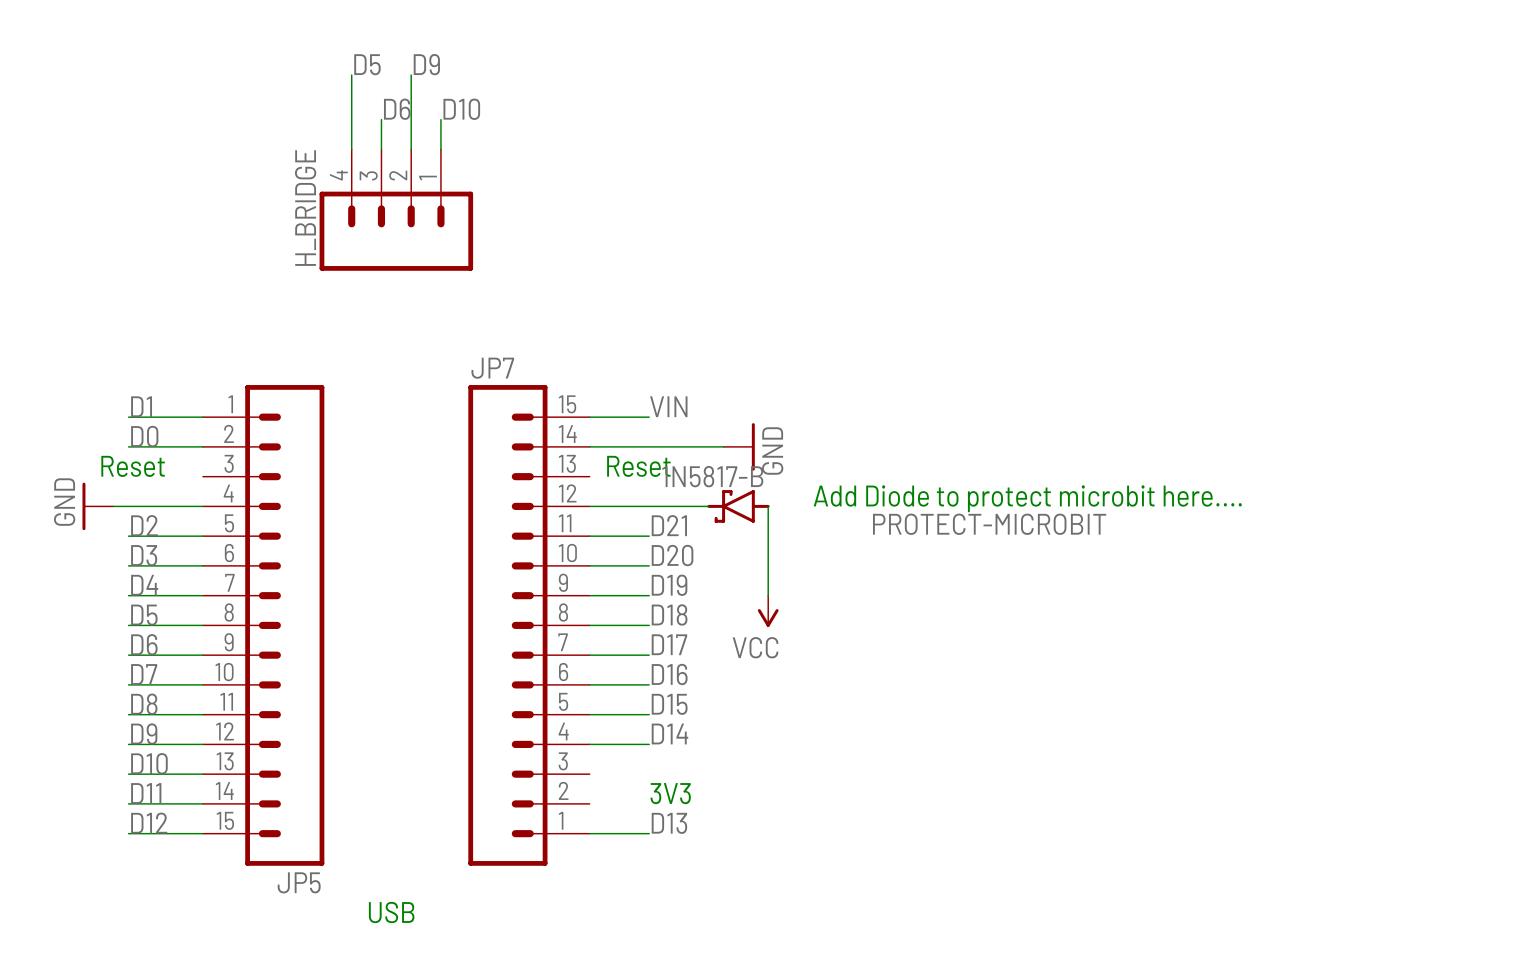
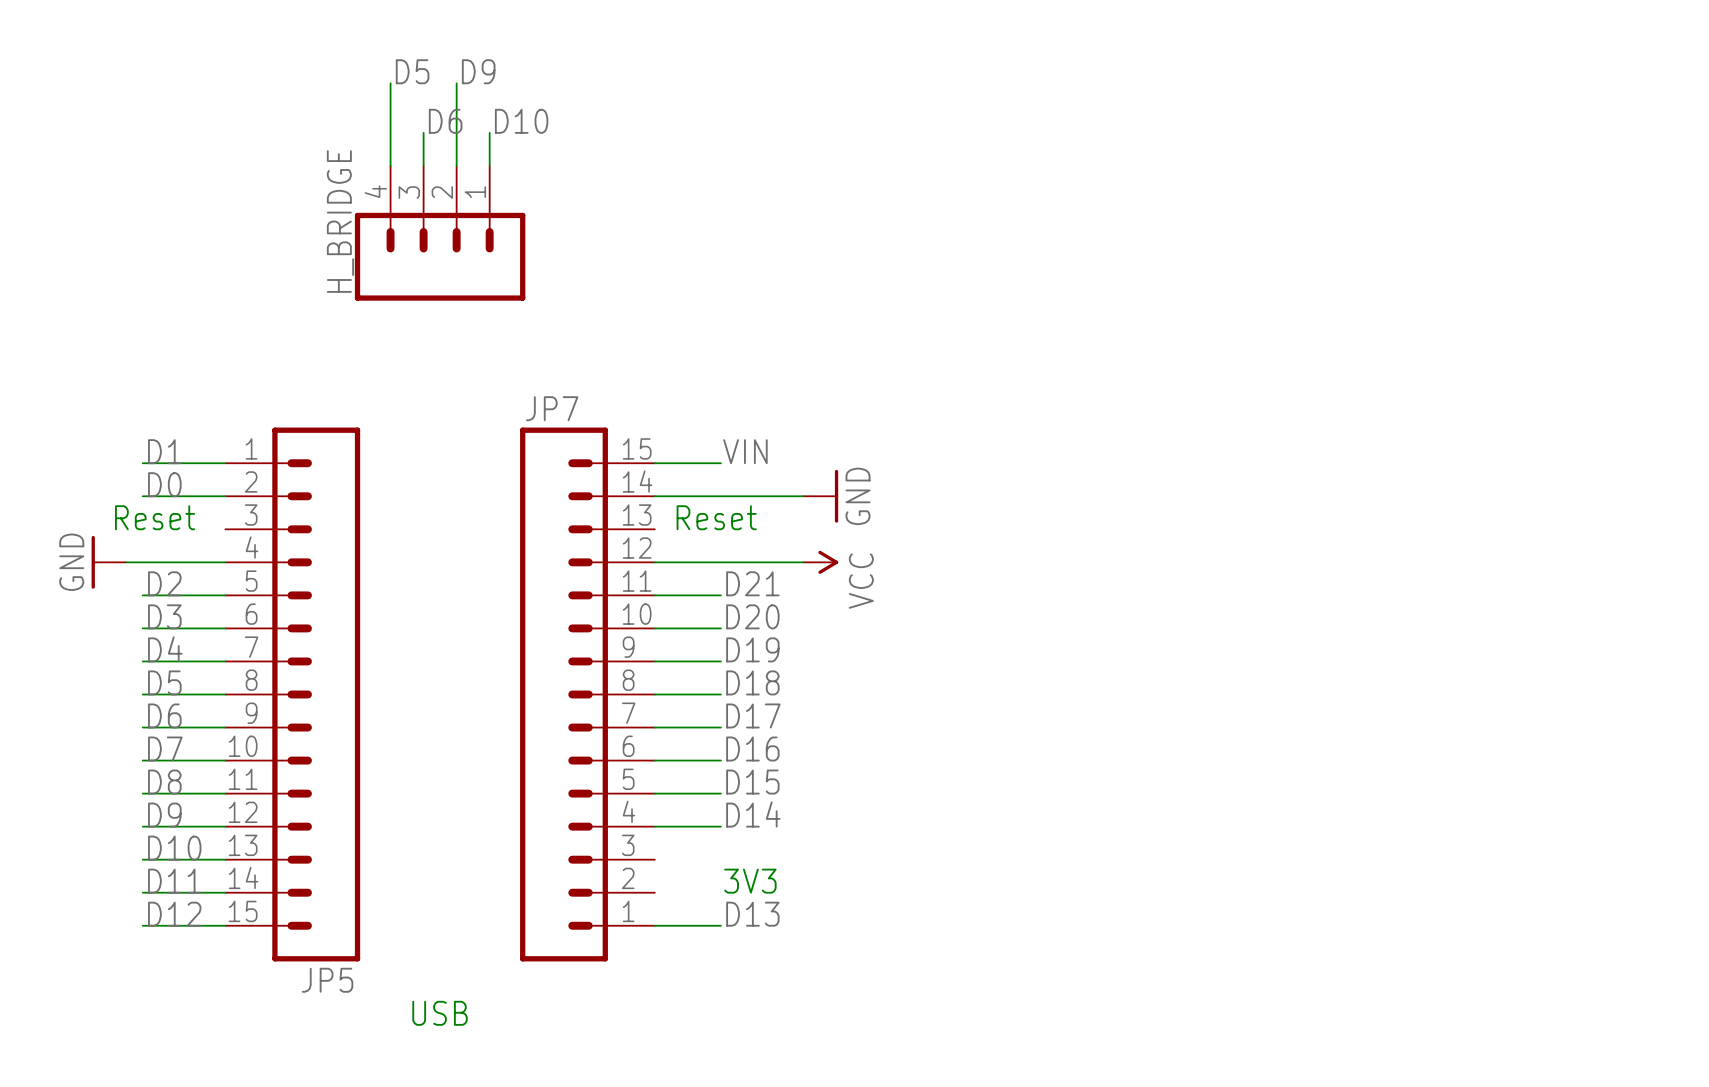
text: Add Diode to protect microbit here.... (1027, 498) -> none
PROTECT-MICROBIT: 1N5817-B (738, 506) -> none
wire: (768, 506) (768, 595) -> none
power symbol position: VCC (768, 611) -> VCC (820, 562)
power symbol rotation: 0° (768, 617) -> 90° counterclockwise (828, 562)

